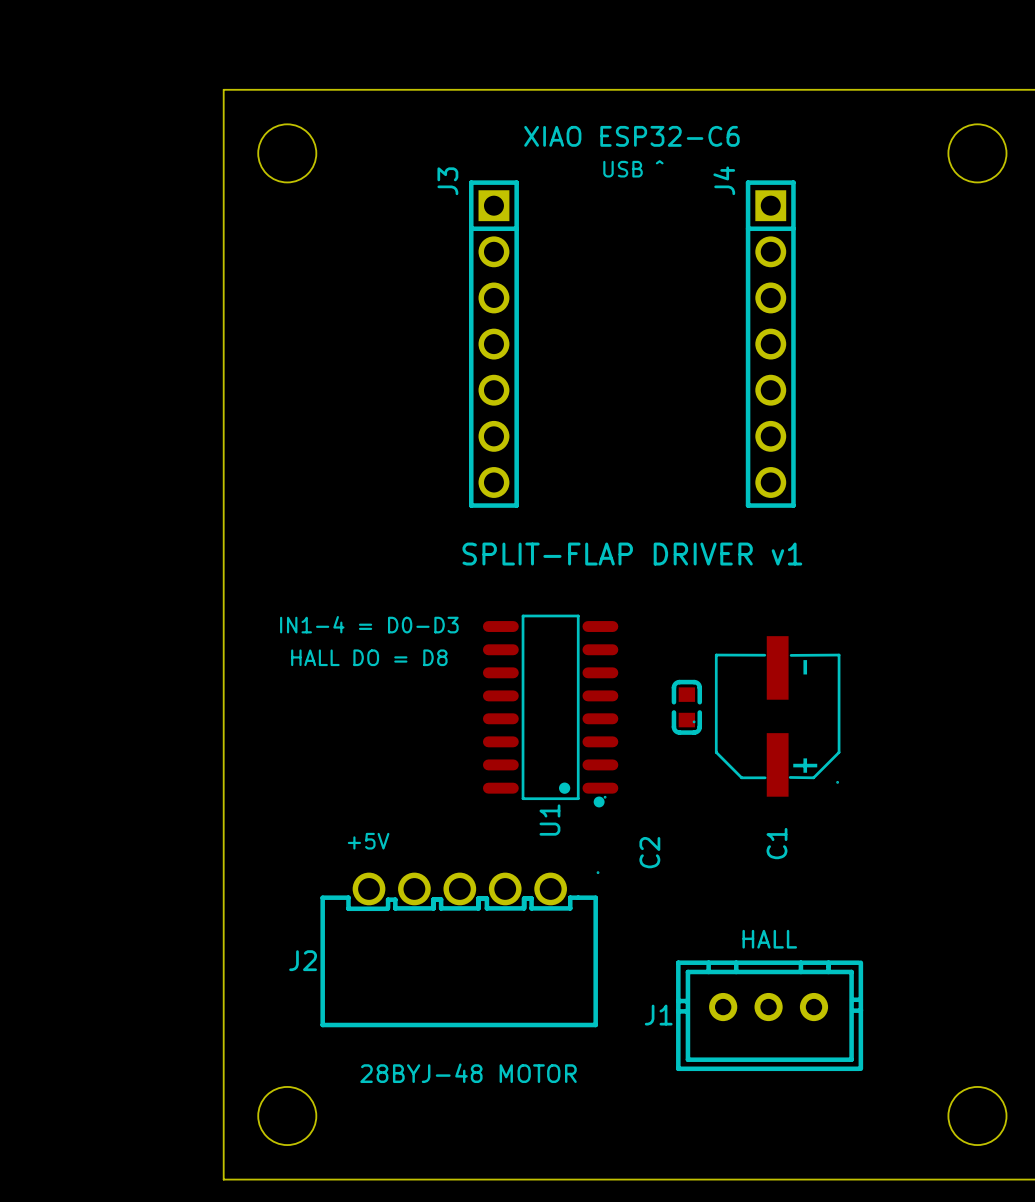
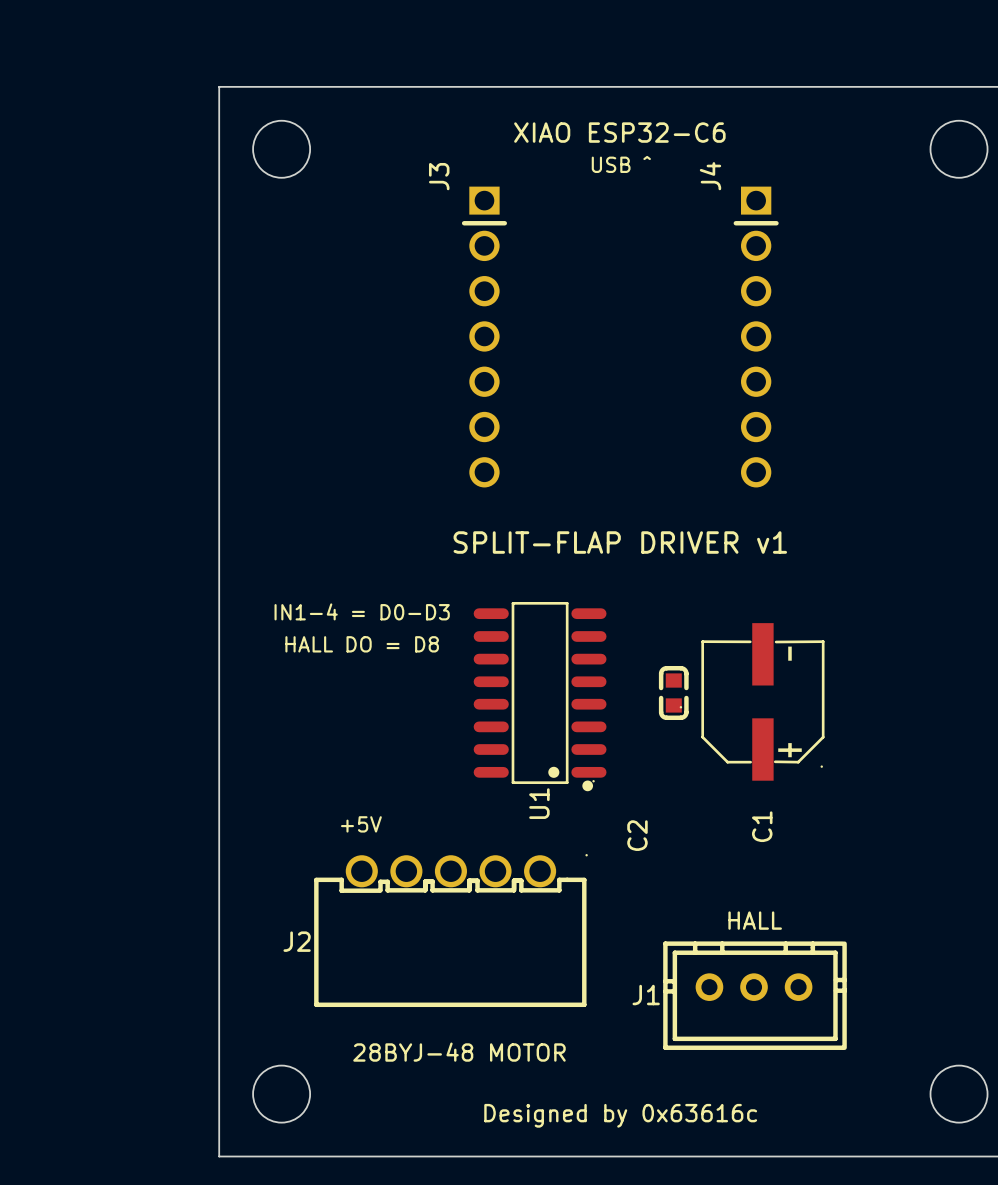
J3 footprint: [468, 180, 519, 508] -> [461, 186, 508, 488]
J4 footprint: [745, 180, 796, 508] -> [733, 186, 779, 488]
text: none -> Designed by 0x63616c (620, 1115)

